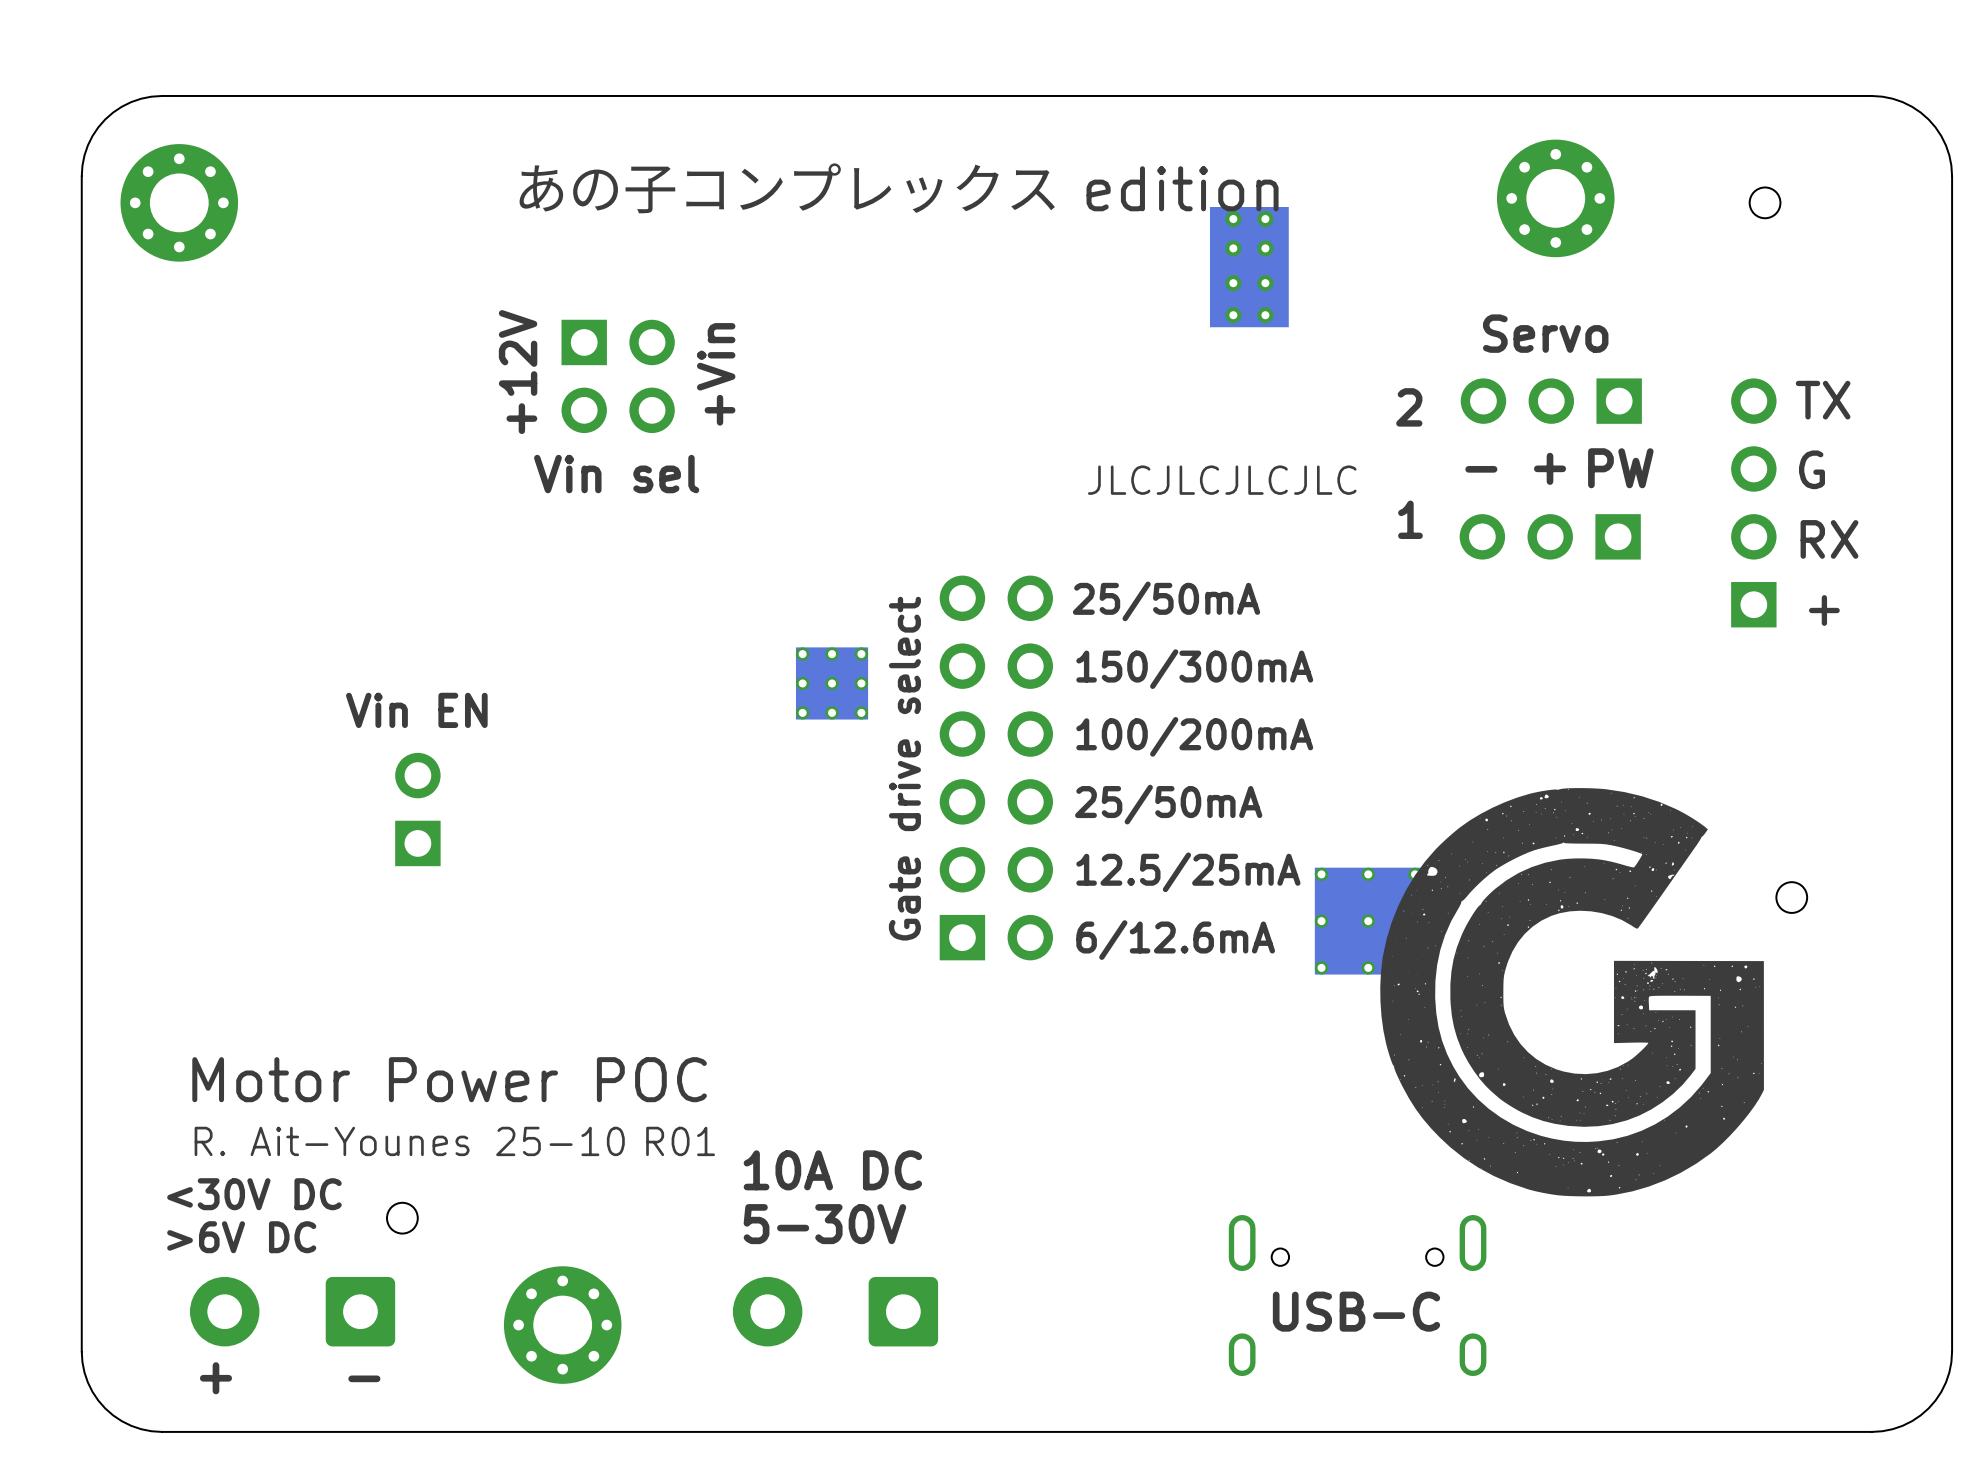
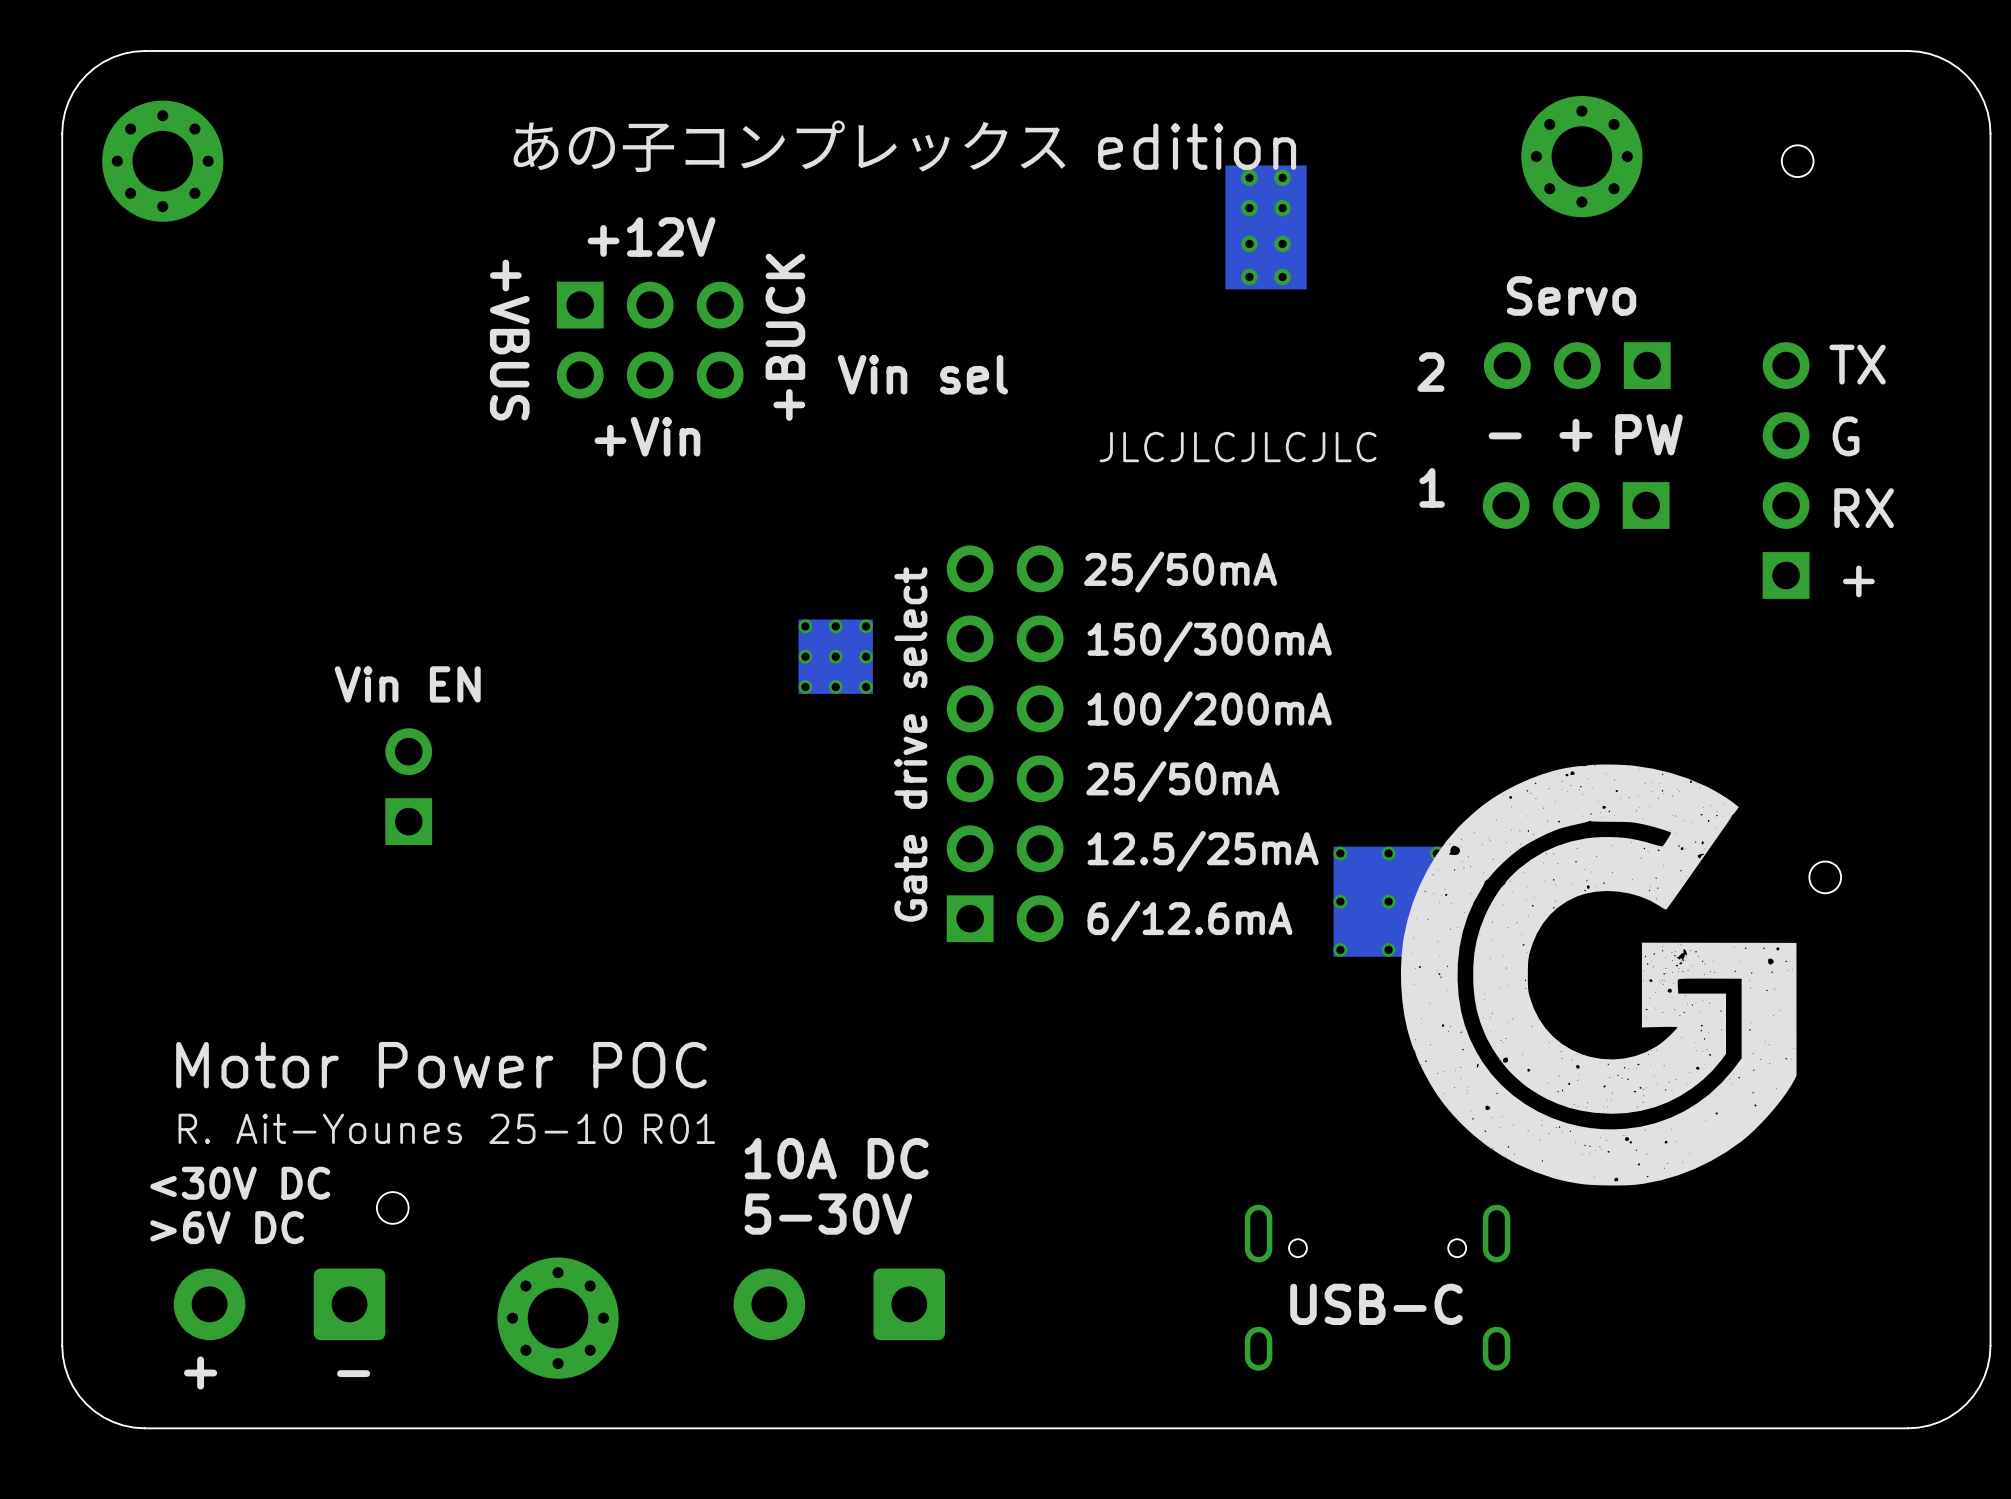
text rotation: 0° (518, 372) -> 90° clockwise (651, 237)
text position: +12V (518, 372) -> +12V (651, 237)
text: none -> +BUCK (785, 337)
text rotation: 0° (716, 374) -> 90° clockwise (647, 436)
text: none -> +VBUS (509, 340)
part: none -> (650, 340)
text position: Vin sel (616, 474) -> Vin sel (922, 374)

